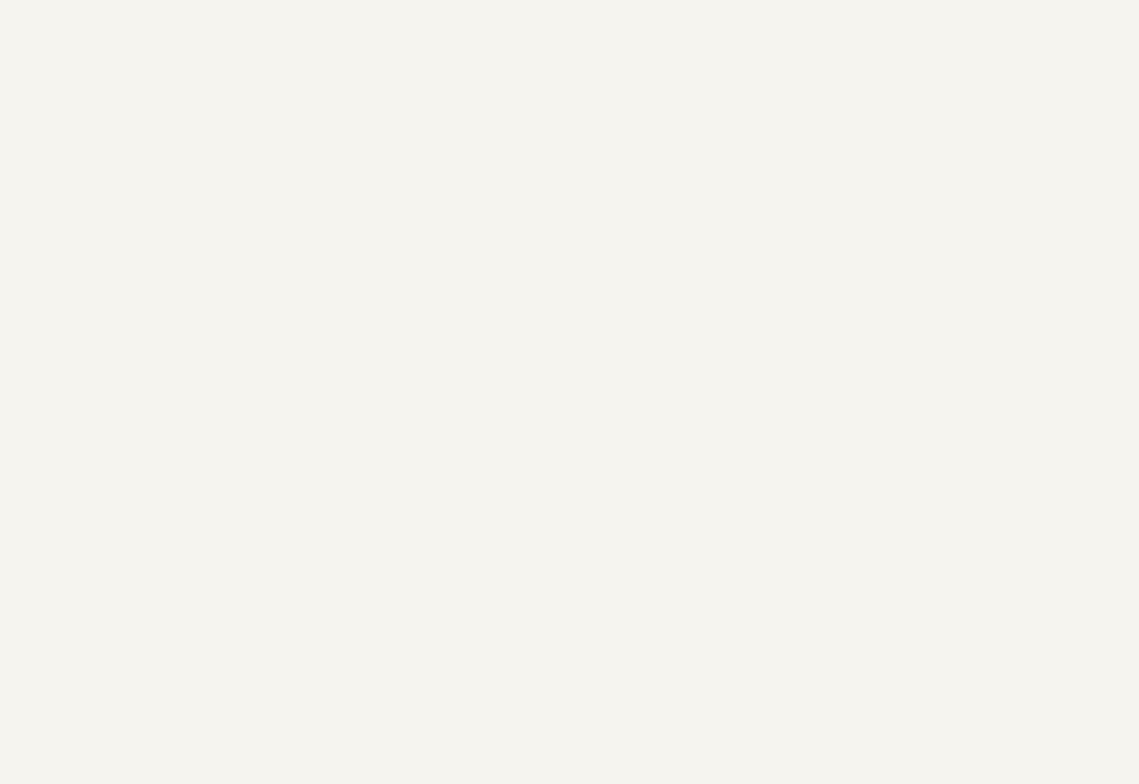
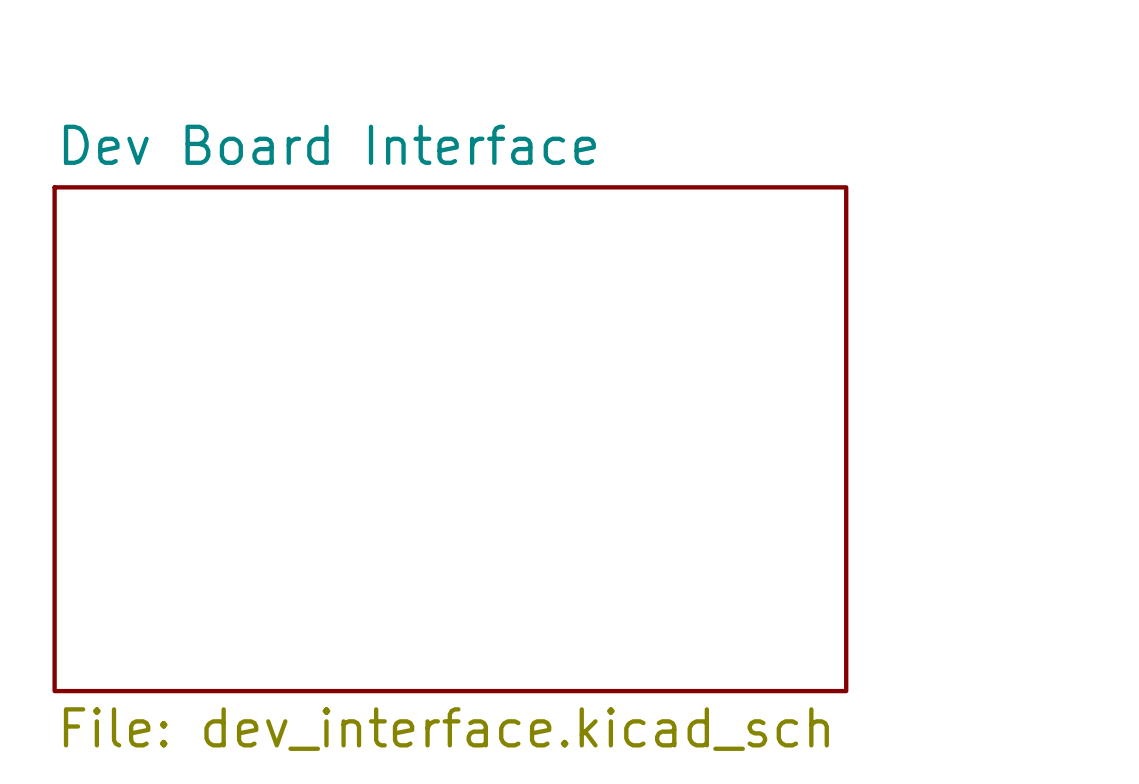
sheet Dev Board Interface: none -> File: dev_interface.kicad_sch (450, 439)

